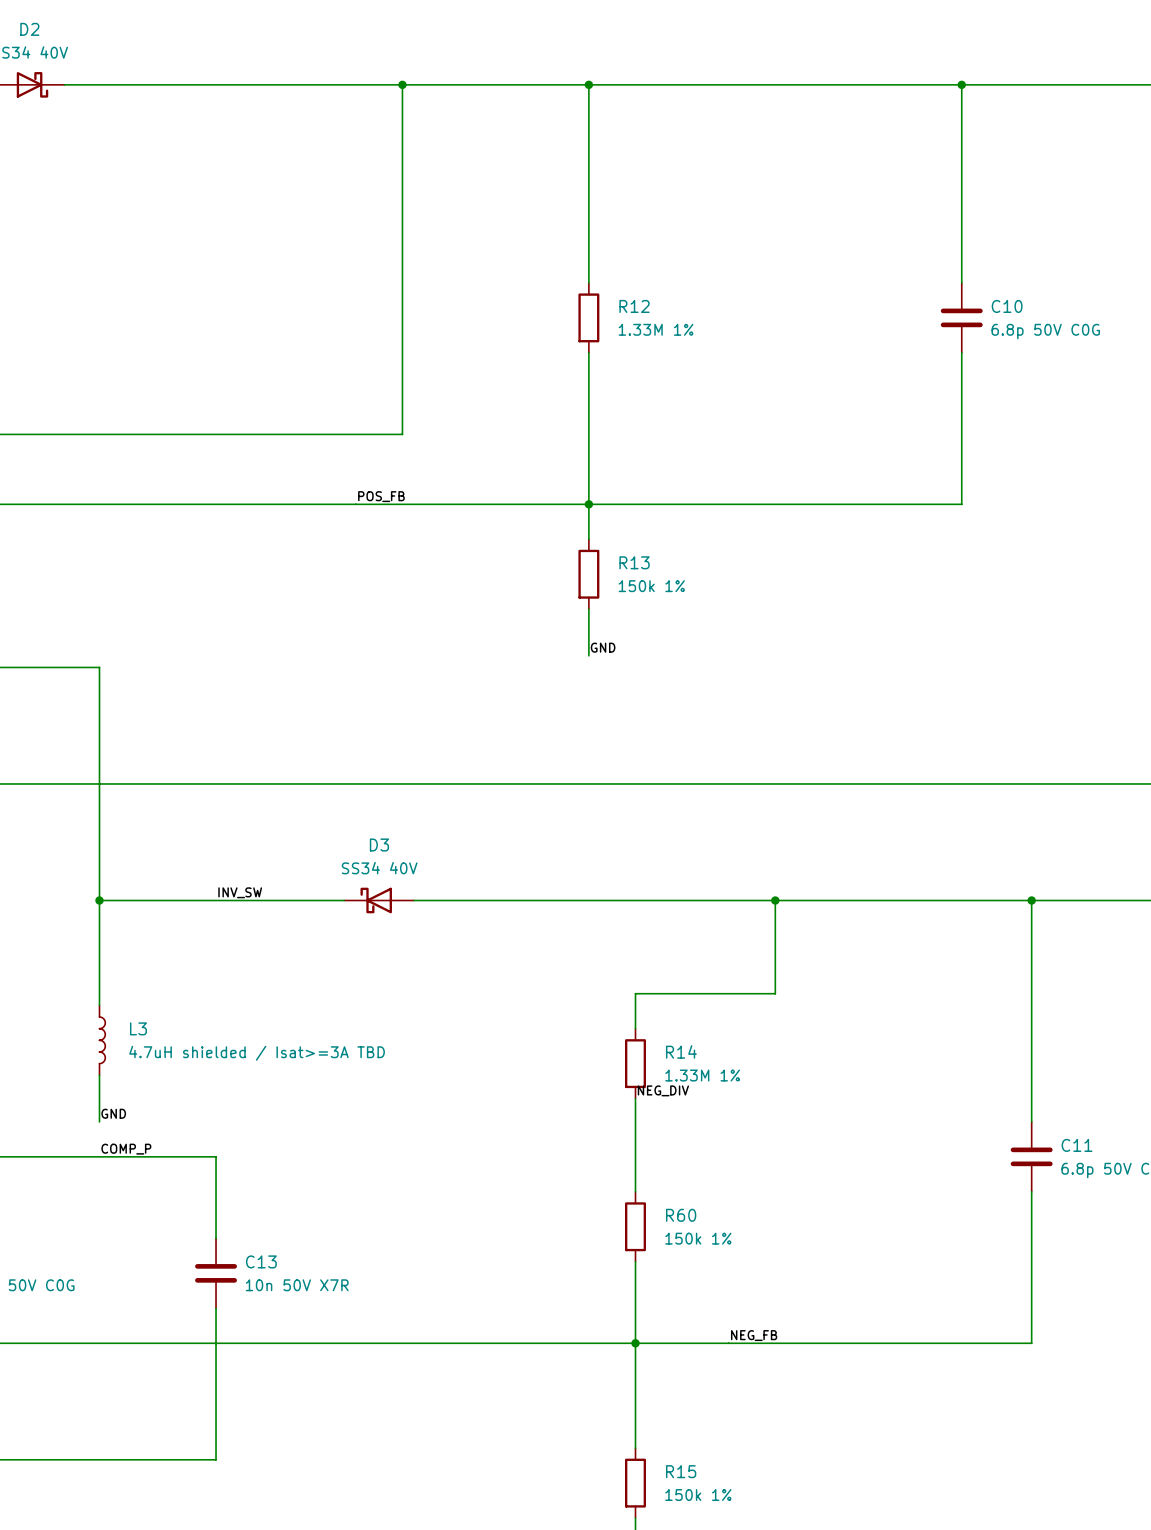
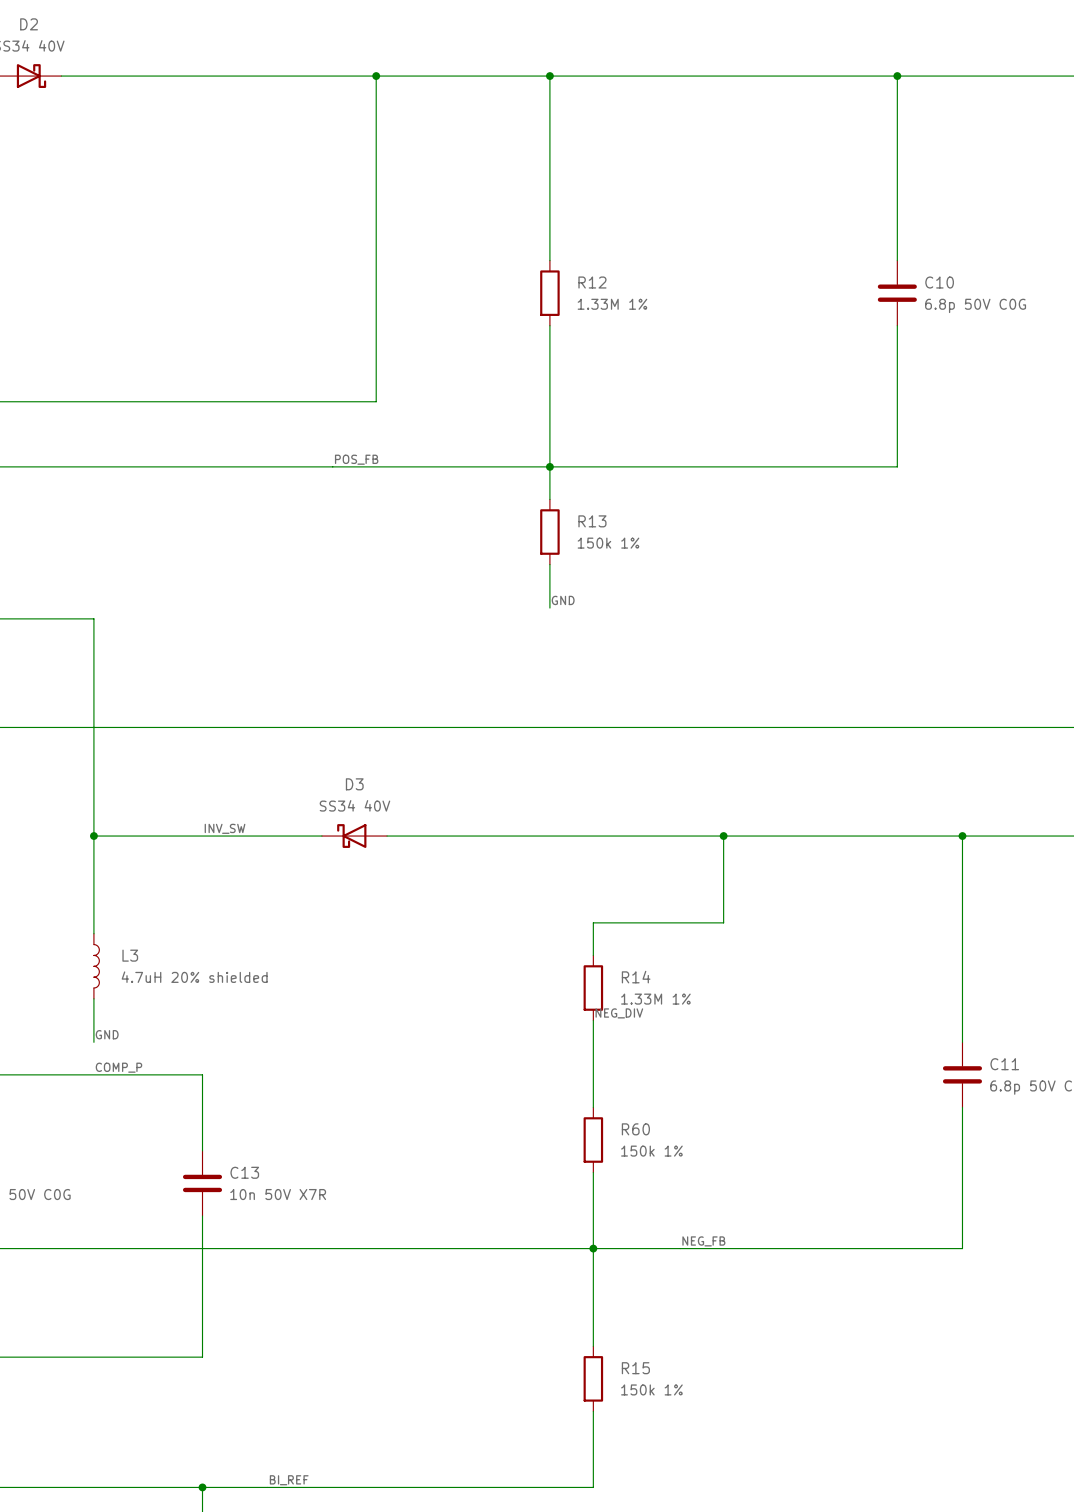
L3 value: 4.7uH shielded / Isat>=3A TBD (257, 1053) -> 4.7uH 20% shielded (194, 977)

